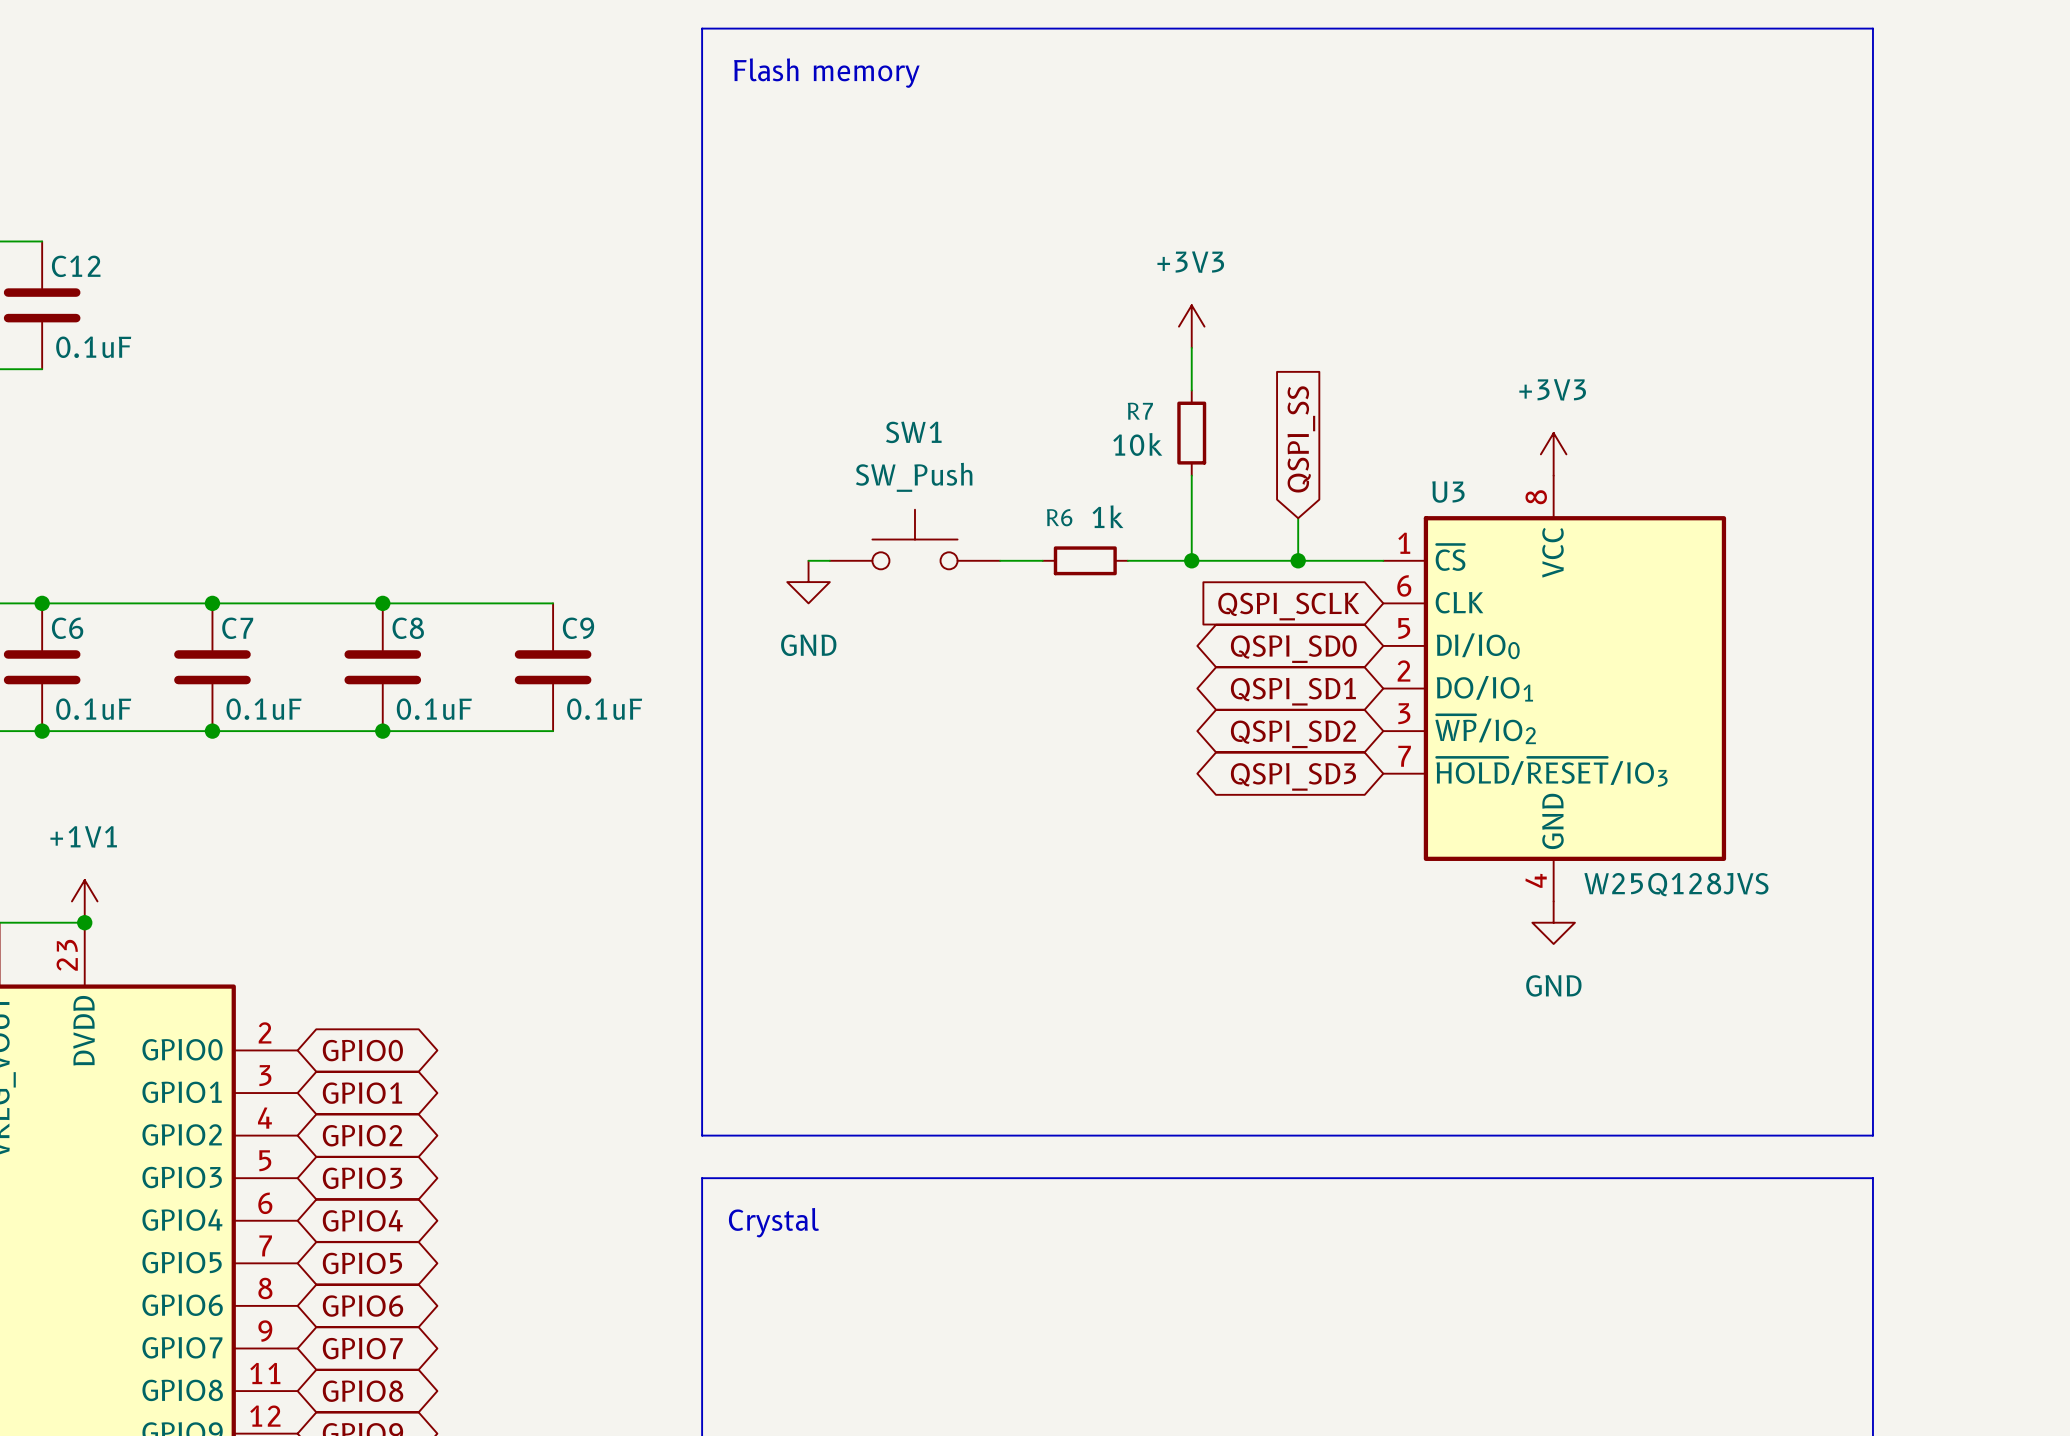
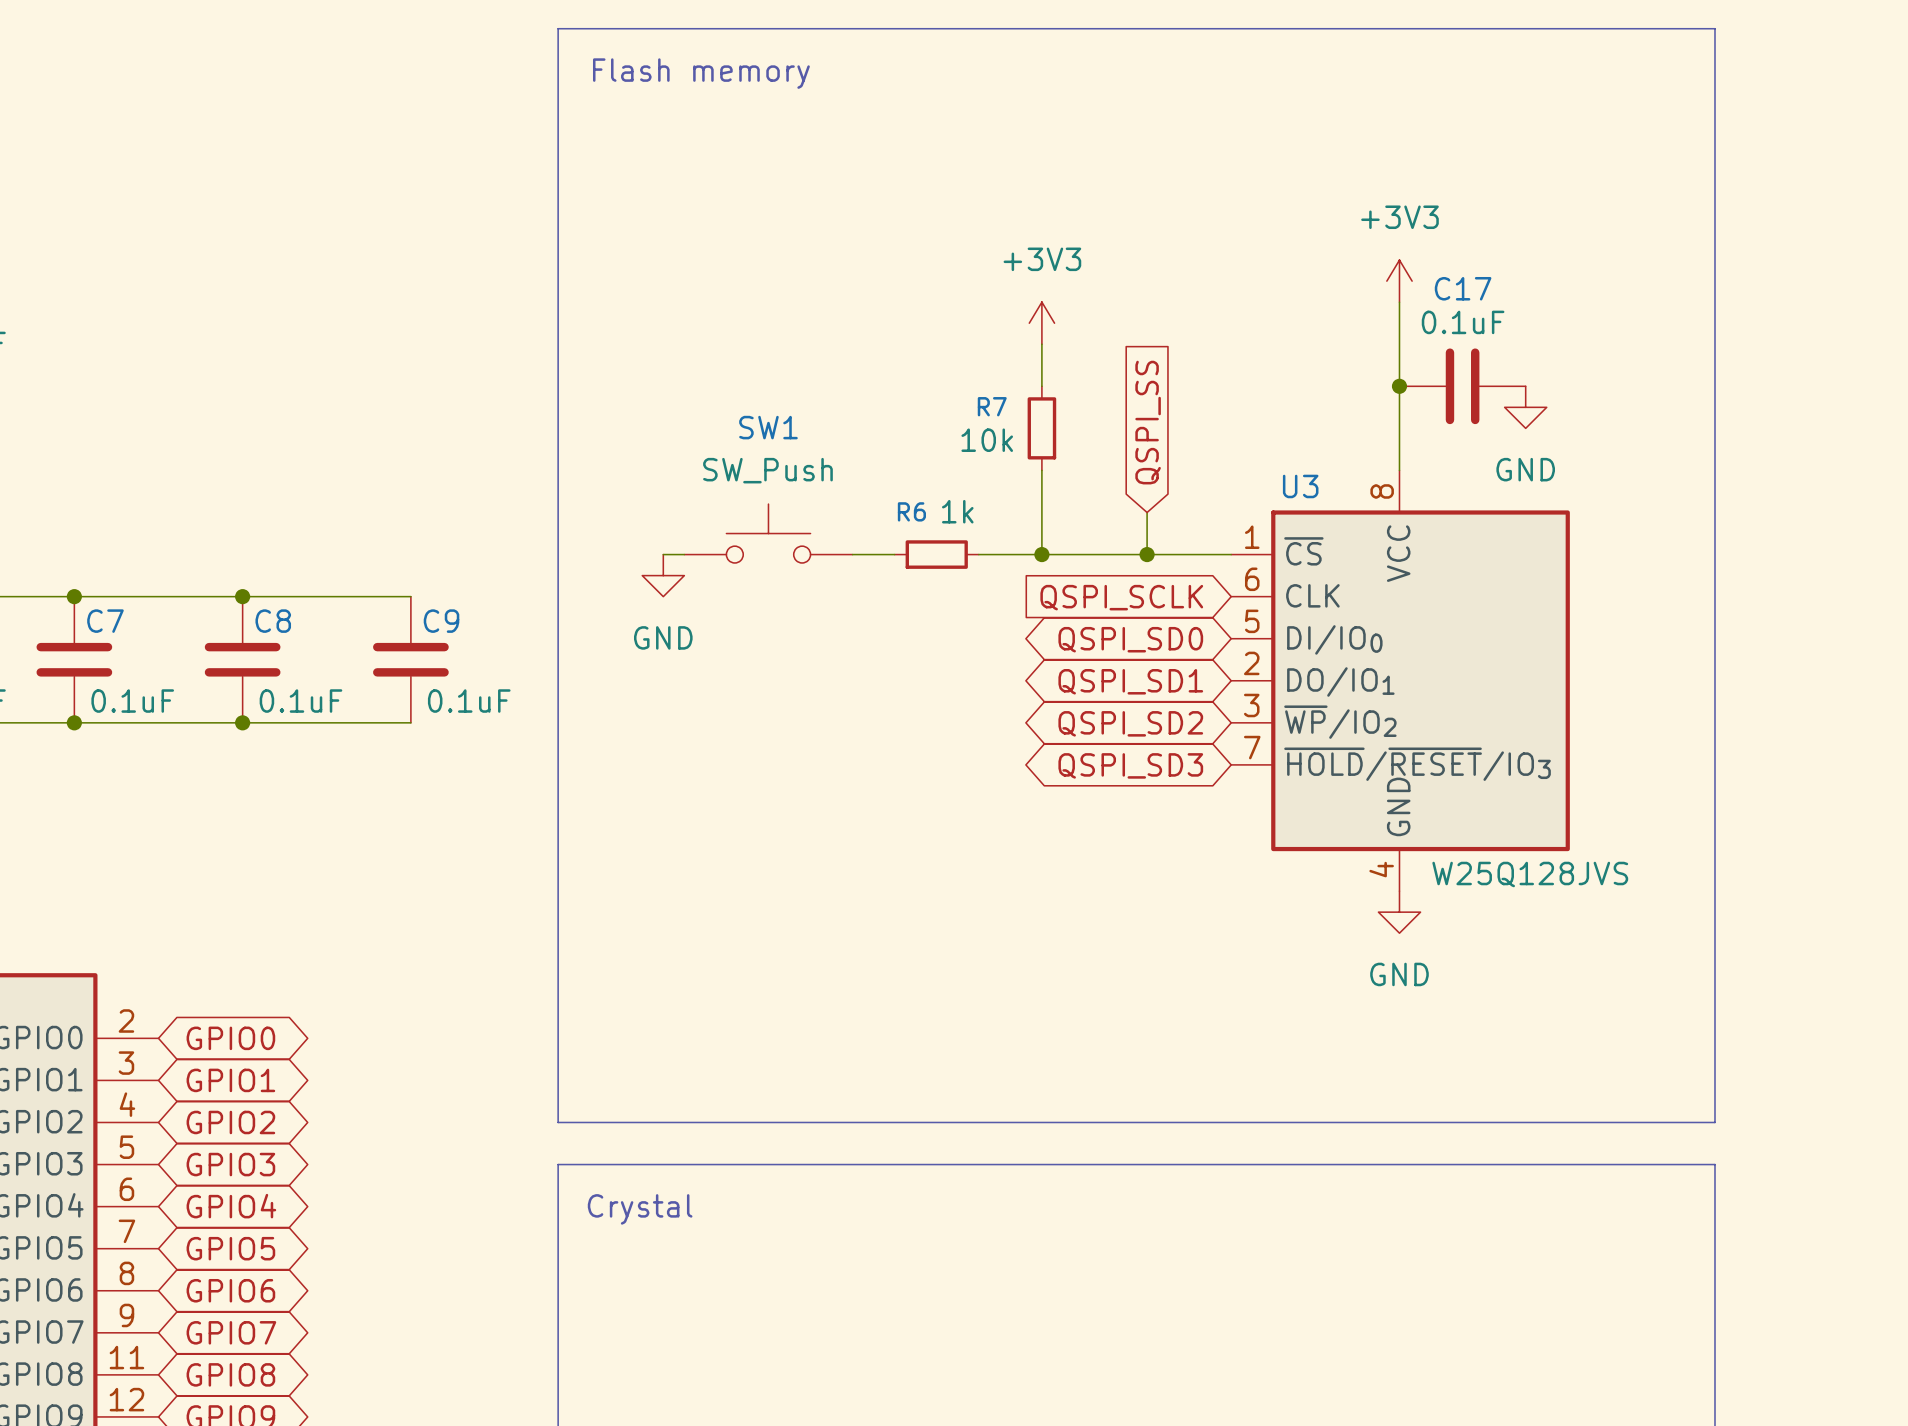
wire: none -> (1399, 302) (1399, 470)
junction: none -> (1399, 386)
C17: none -> 0.1uF (1462, 386)
power symbol: none -> GND (1525, 407)
power symbol position: +3V3 (1553, 454) -> +3V3 (1399, 281)

